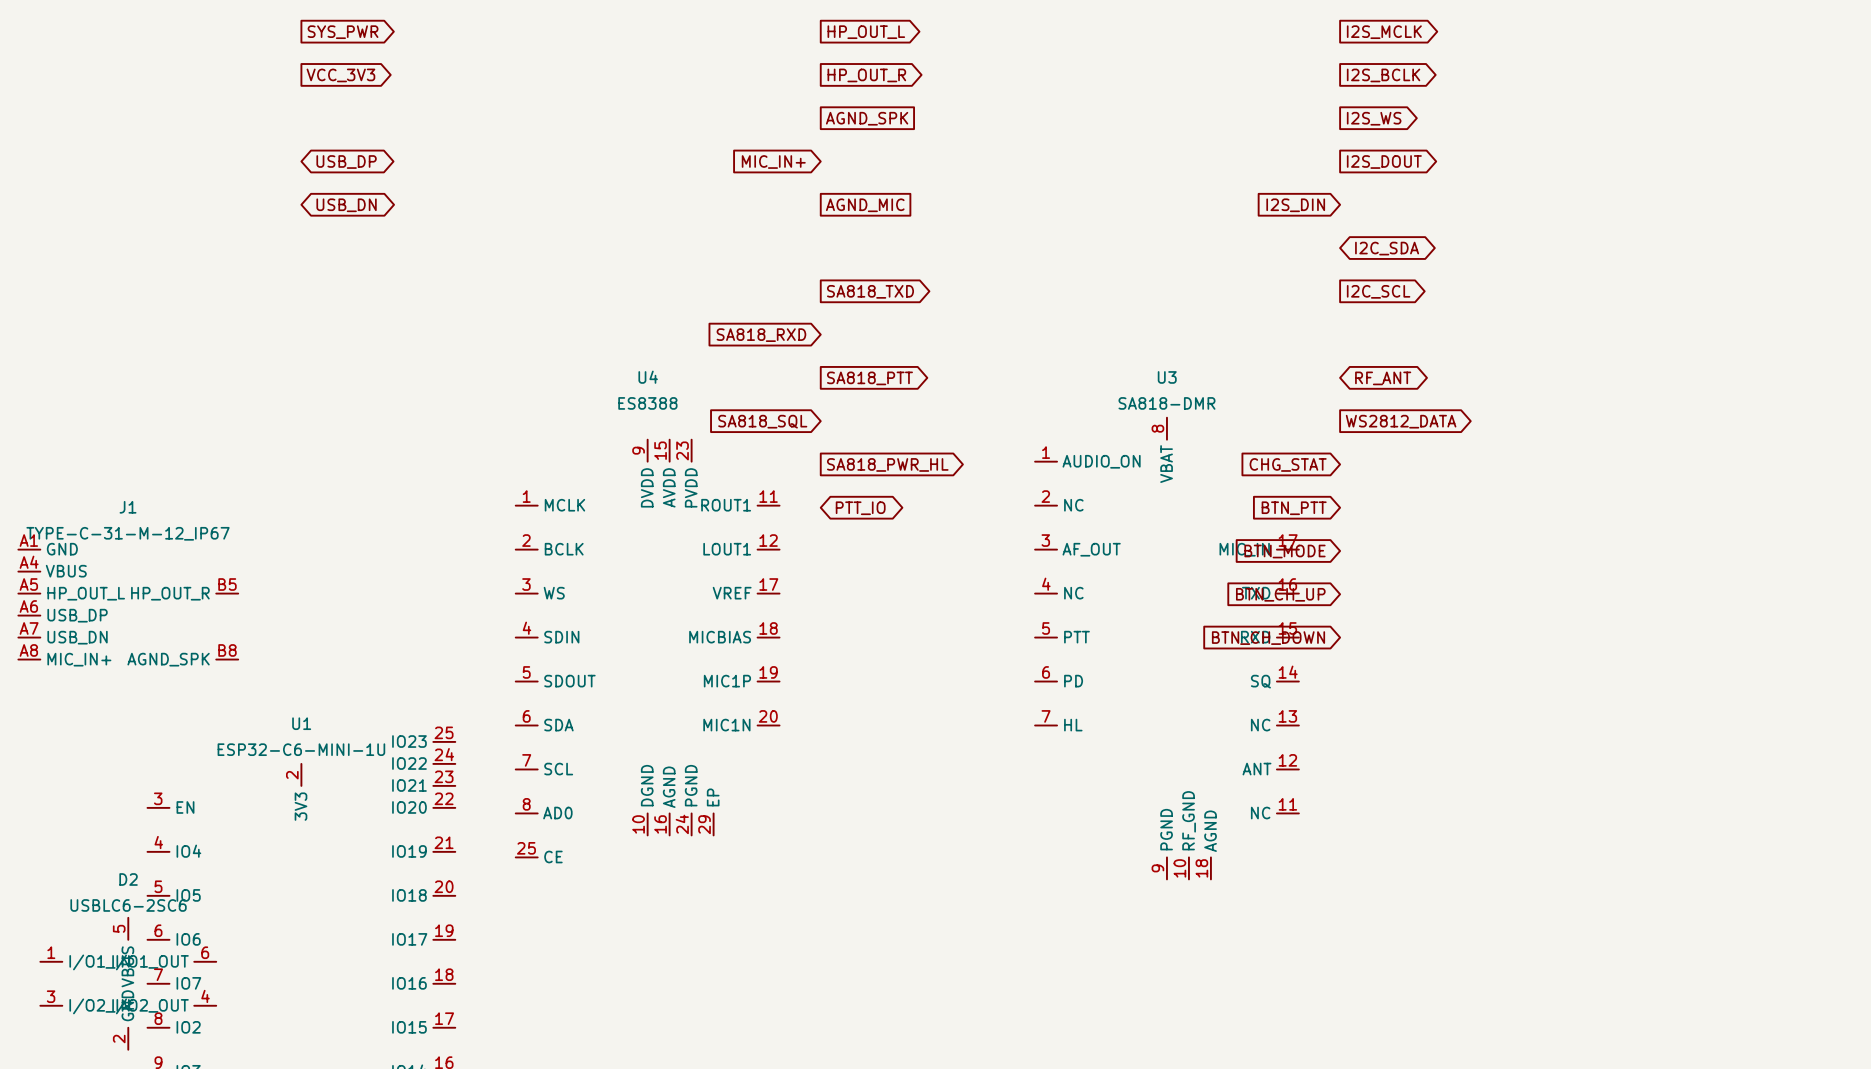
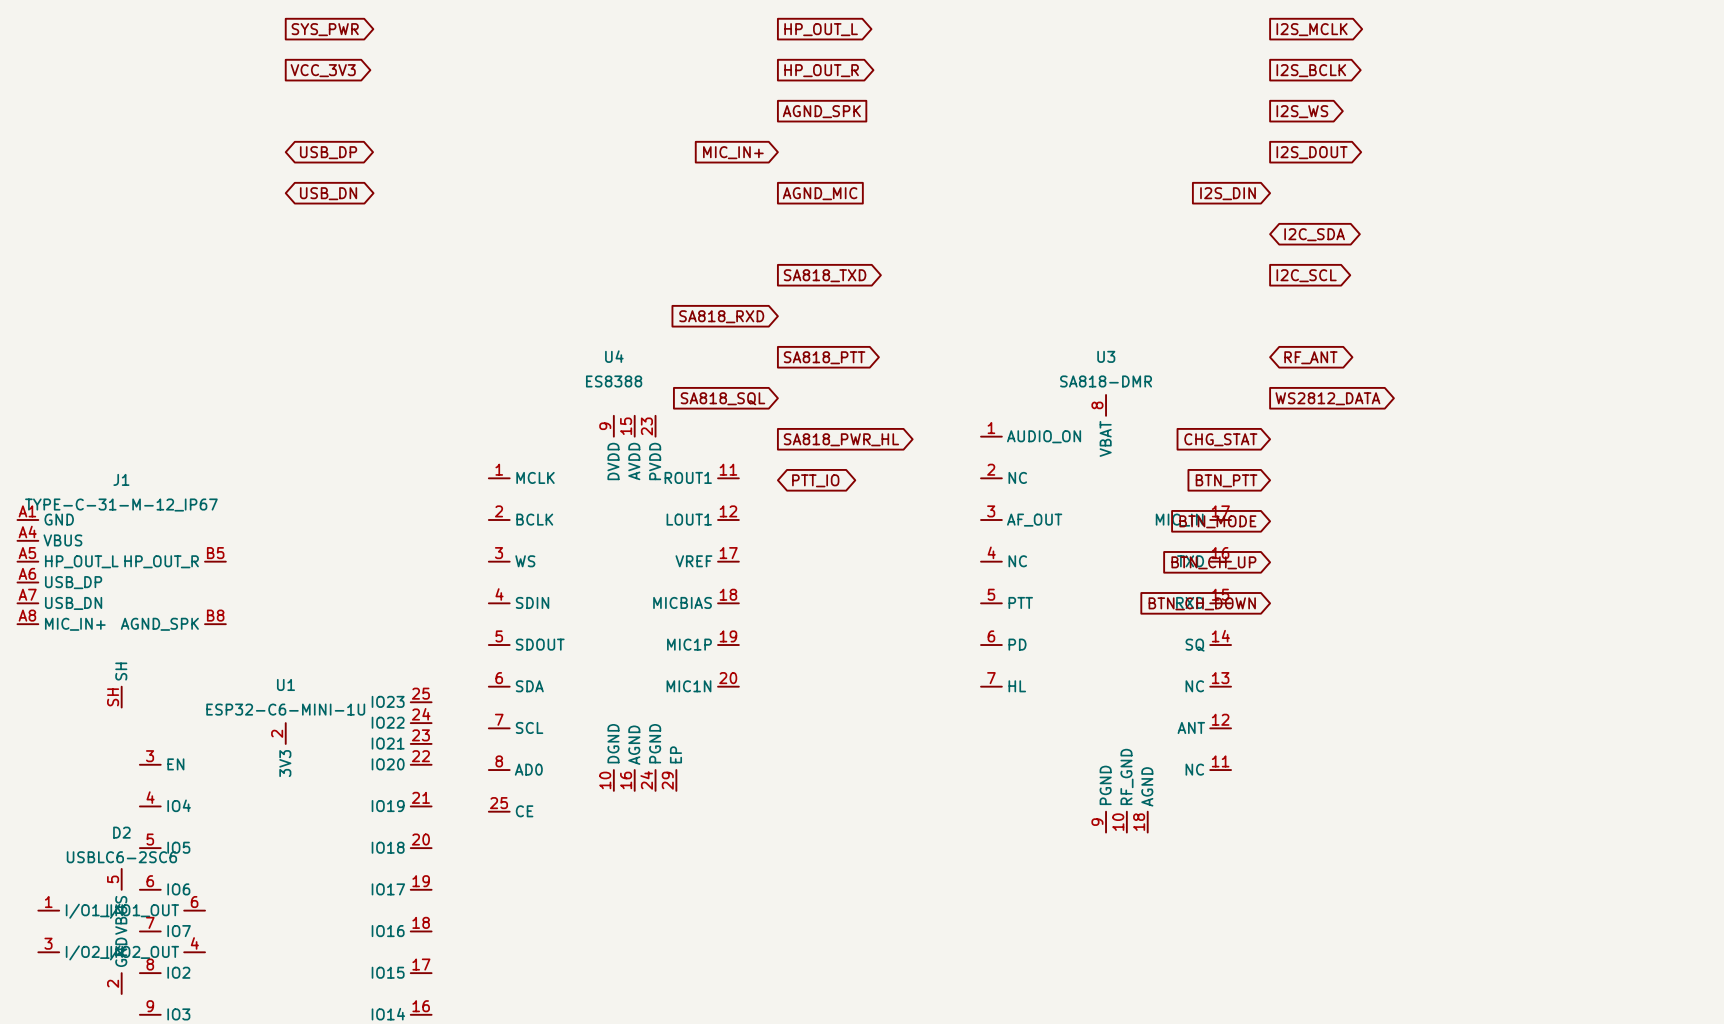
J1 symbol: [18, 549, 239, 660] -> [17, 520, 226, 708]

